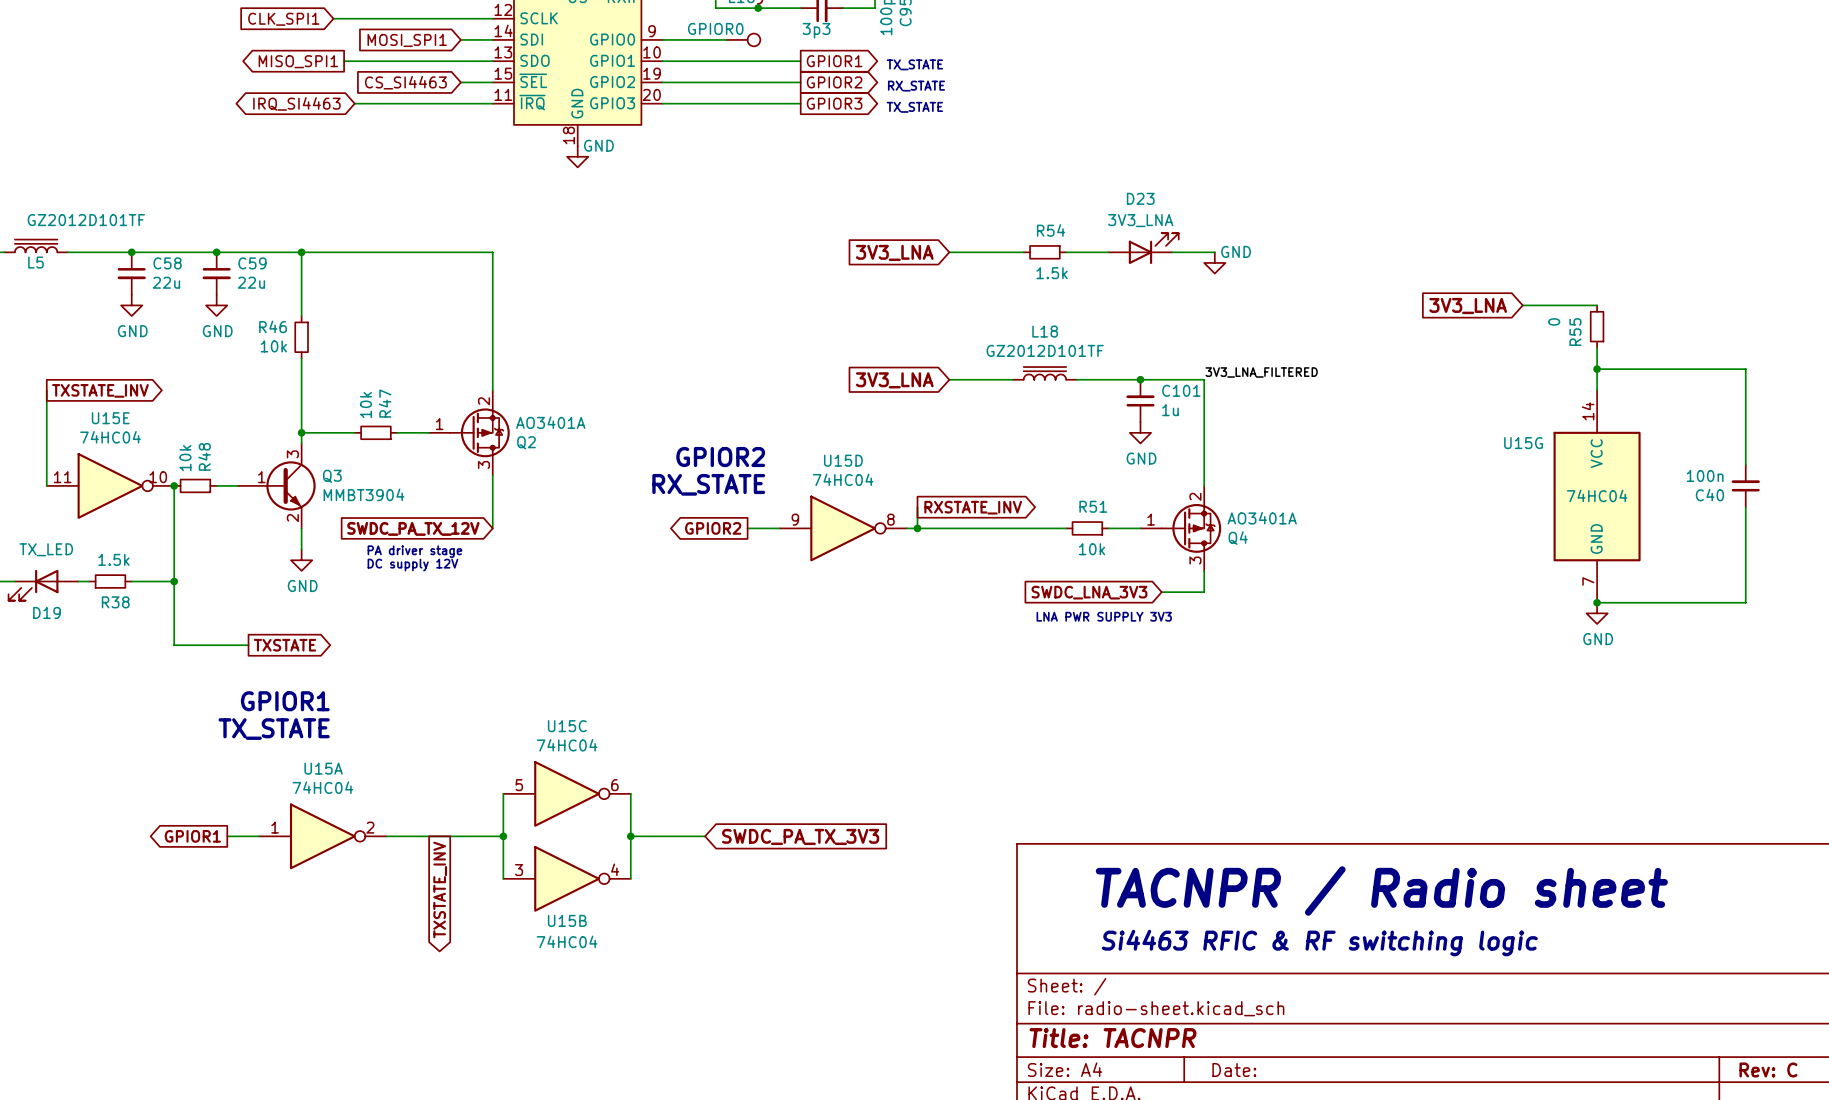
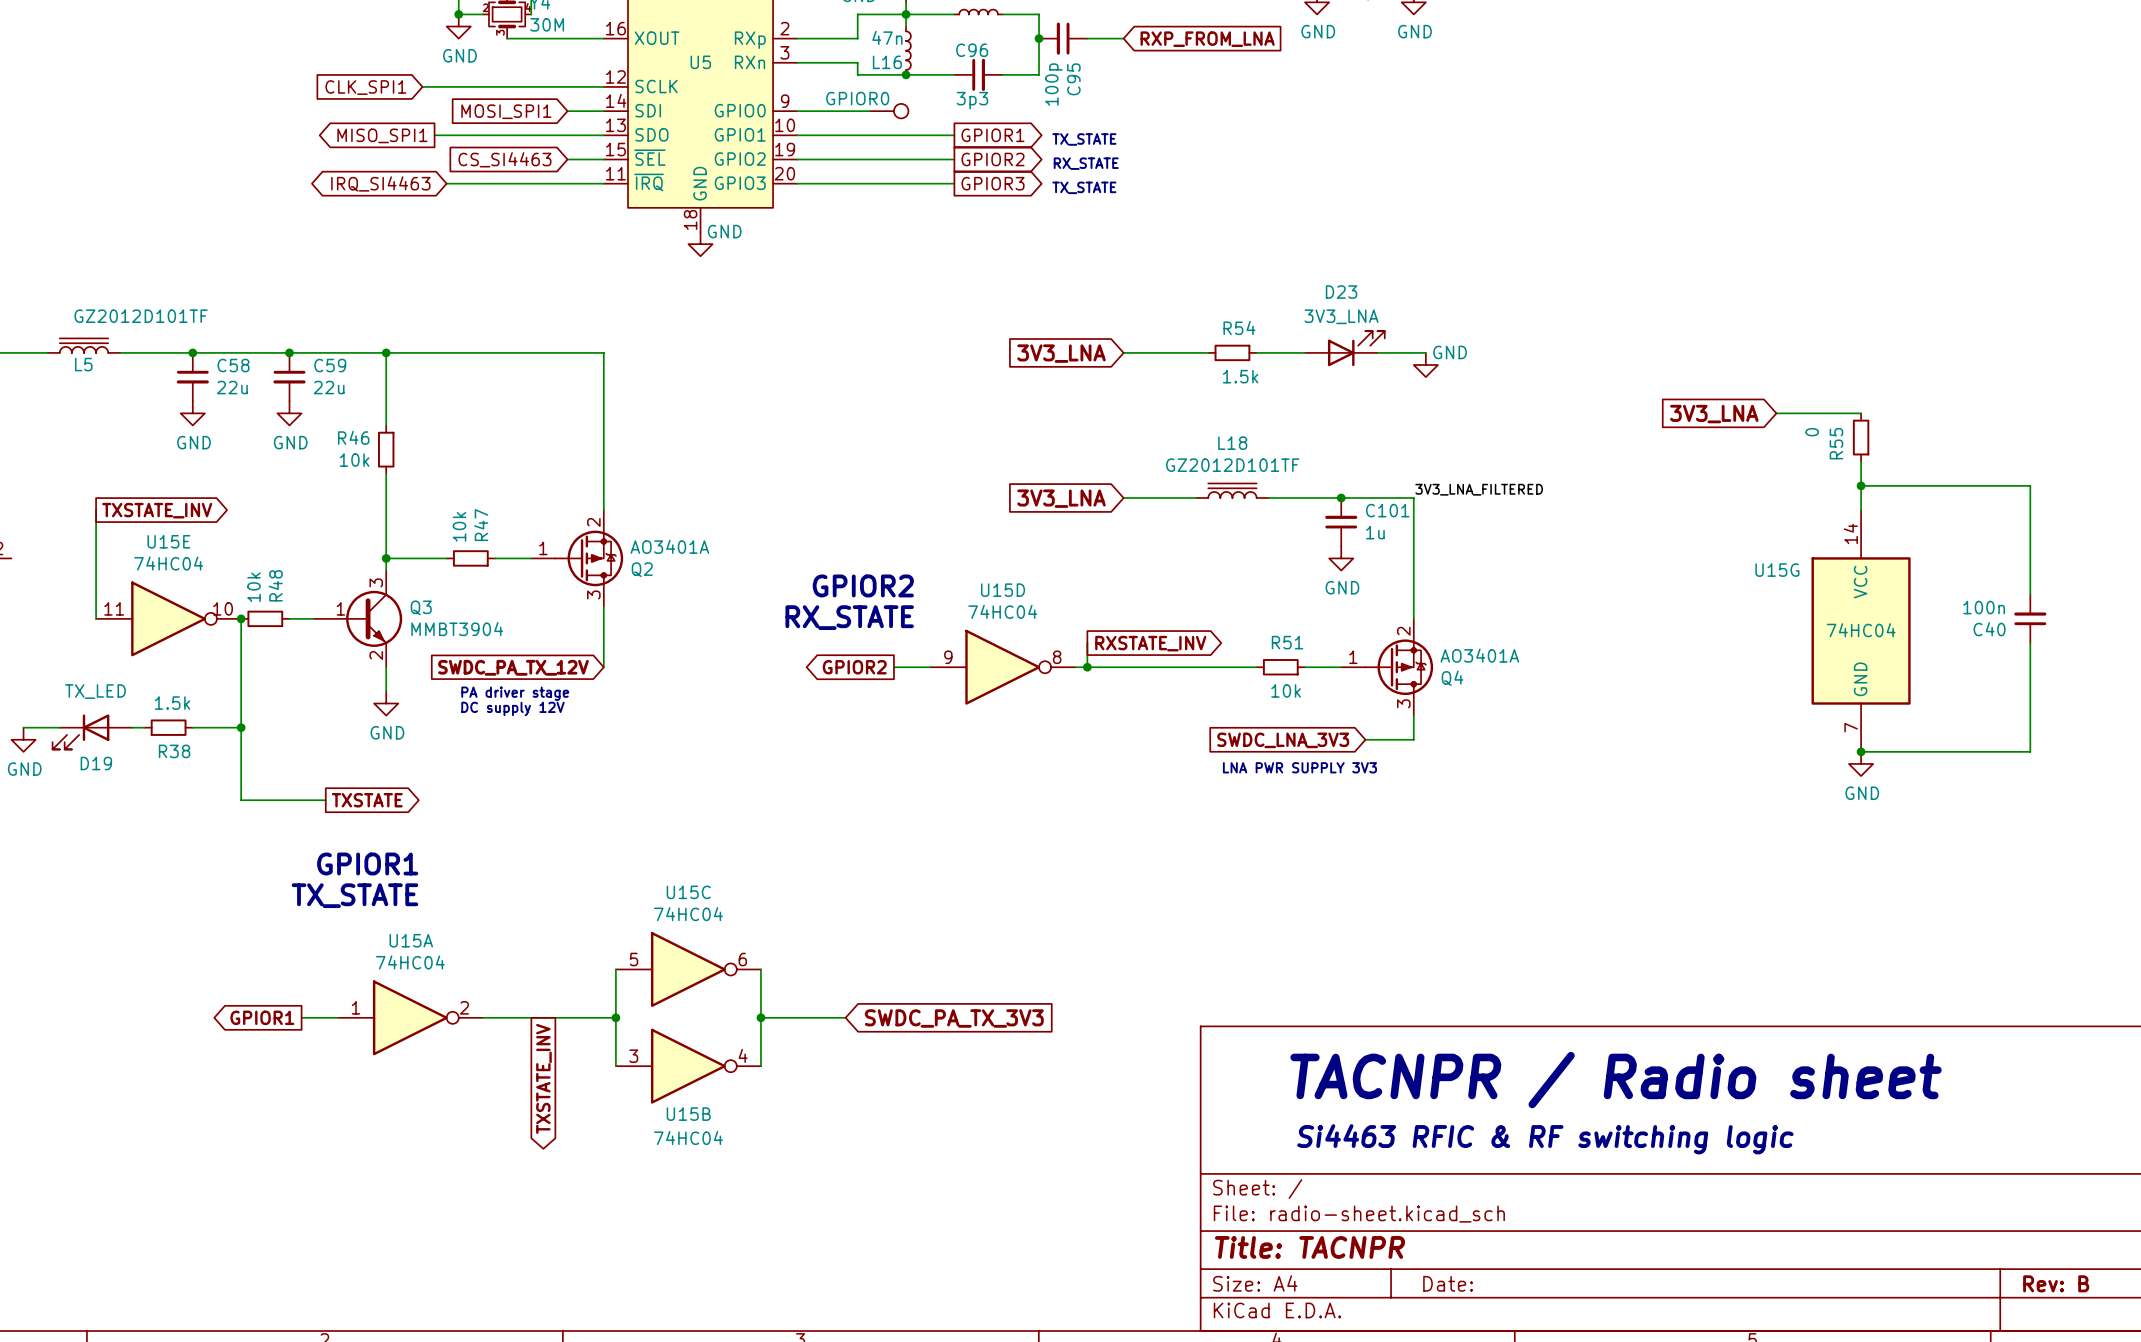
title block: Rev: C (1768, 1069) -> Rev: B (2056, 1283)

